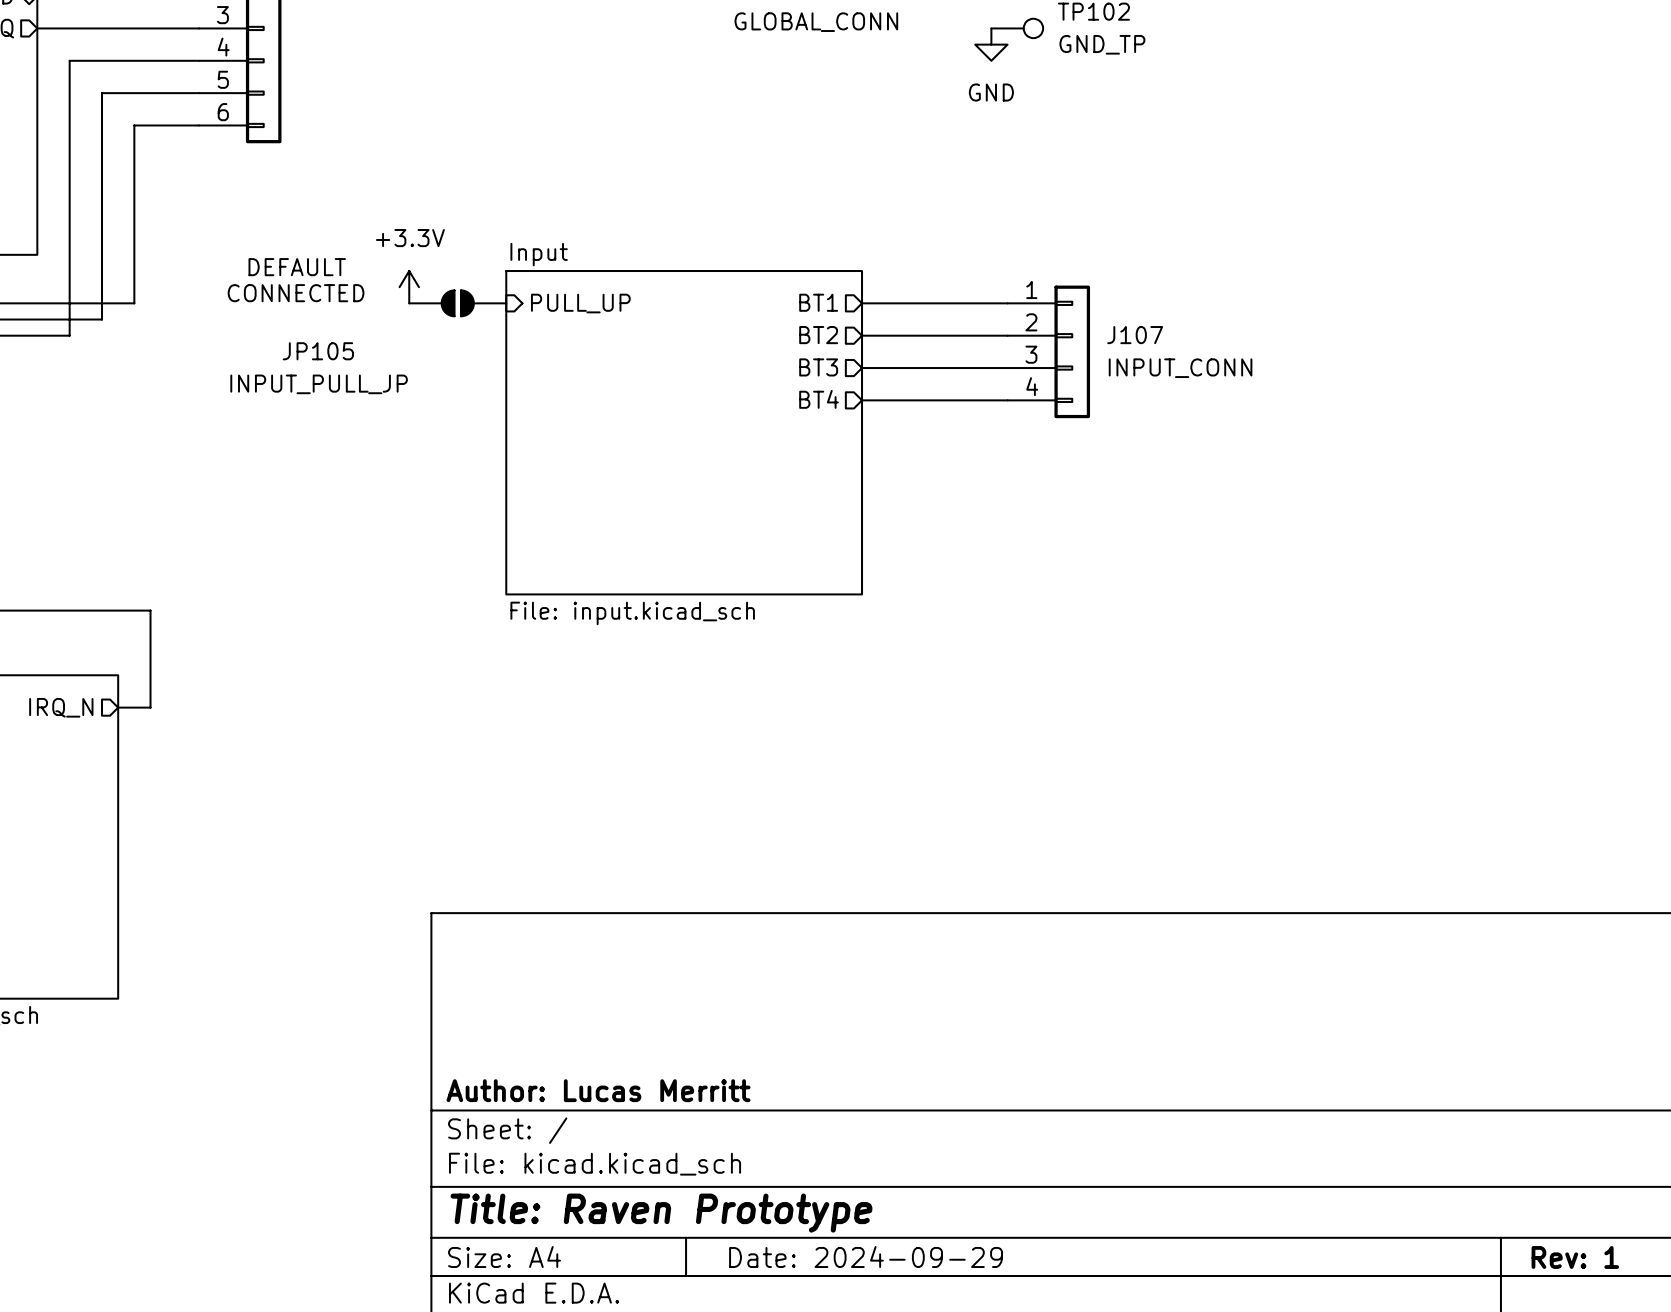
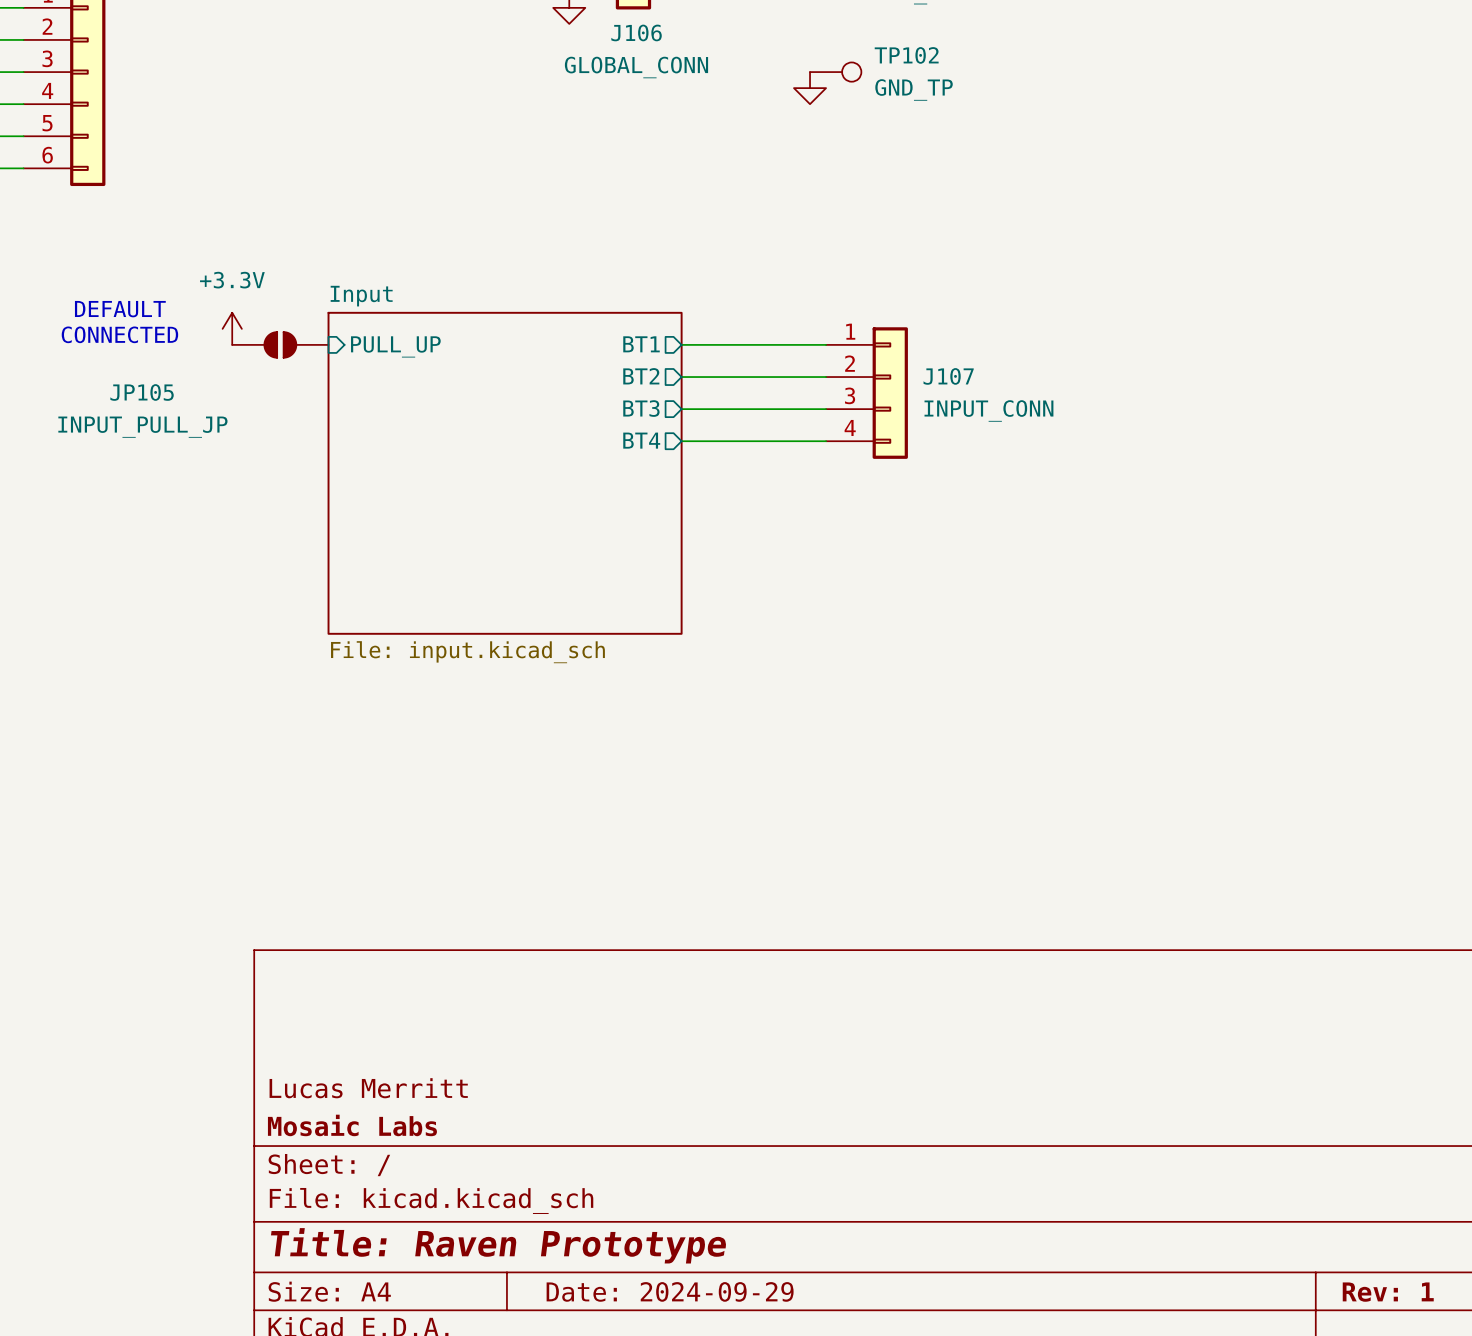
power symbol text: GND (991, 92) -> none
title block: none -> Lucas Merritt (368, 1088)
title block: Author: Lucas Merritt (598, 1090) -> Mosaic Labs (352, 1125)

